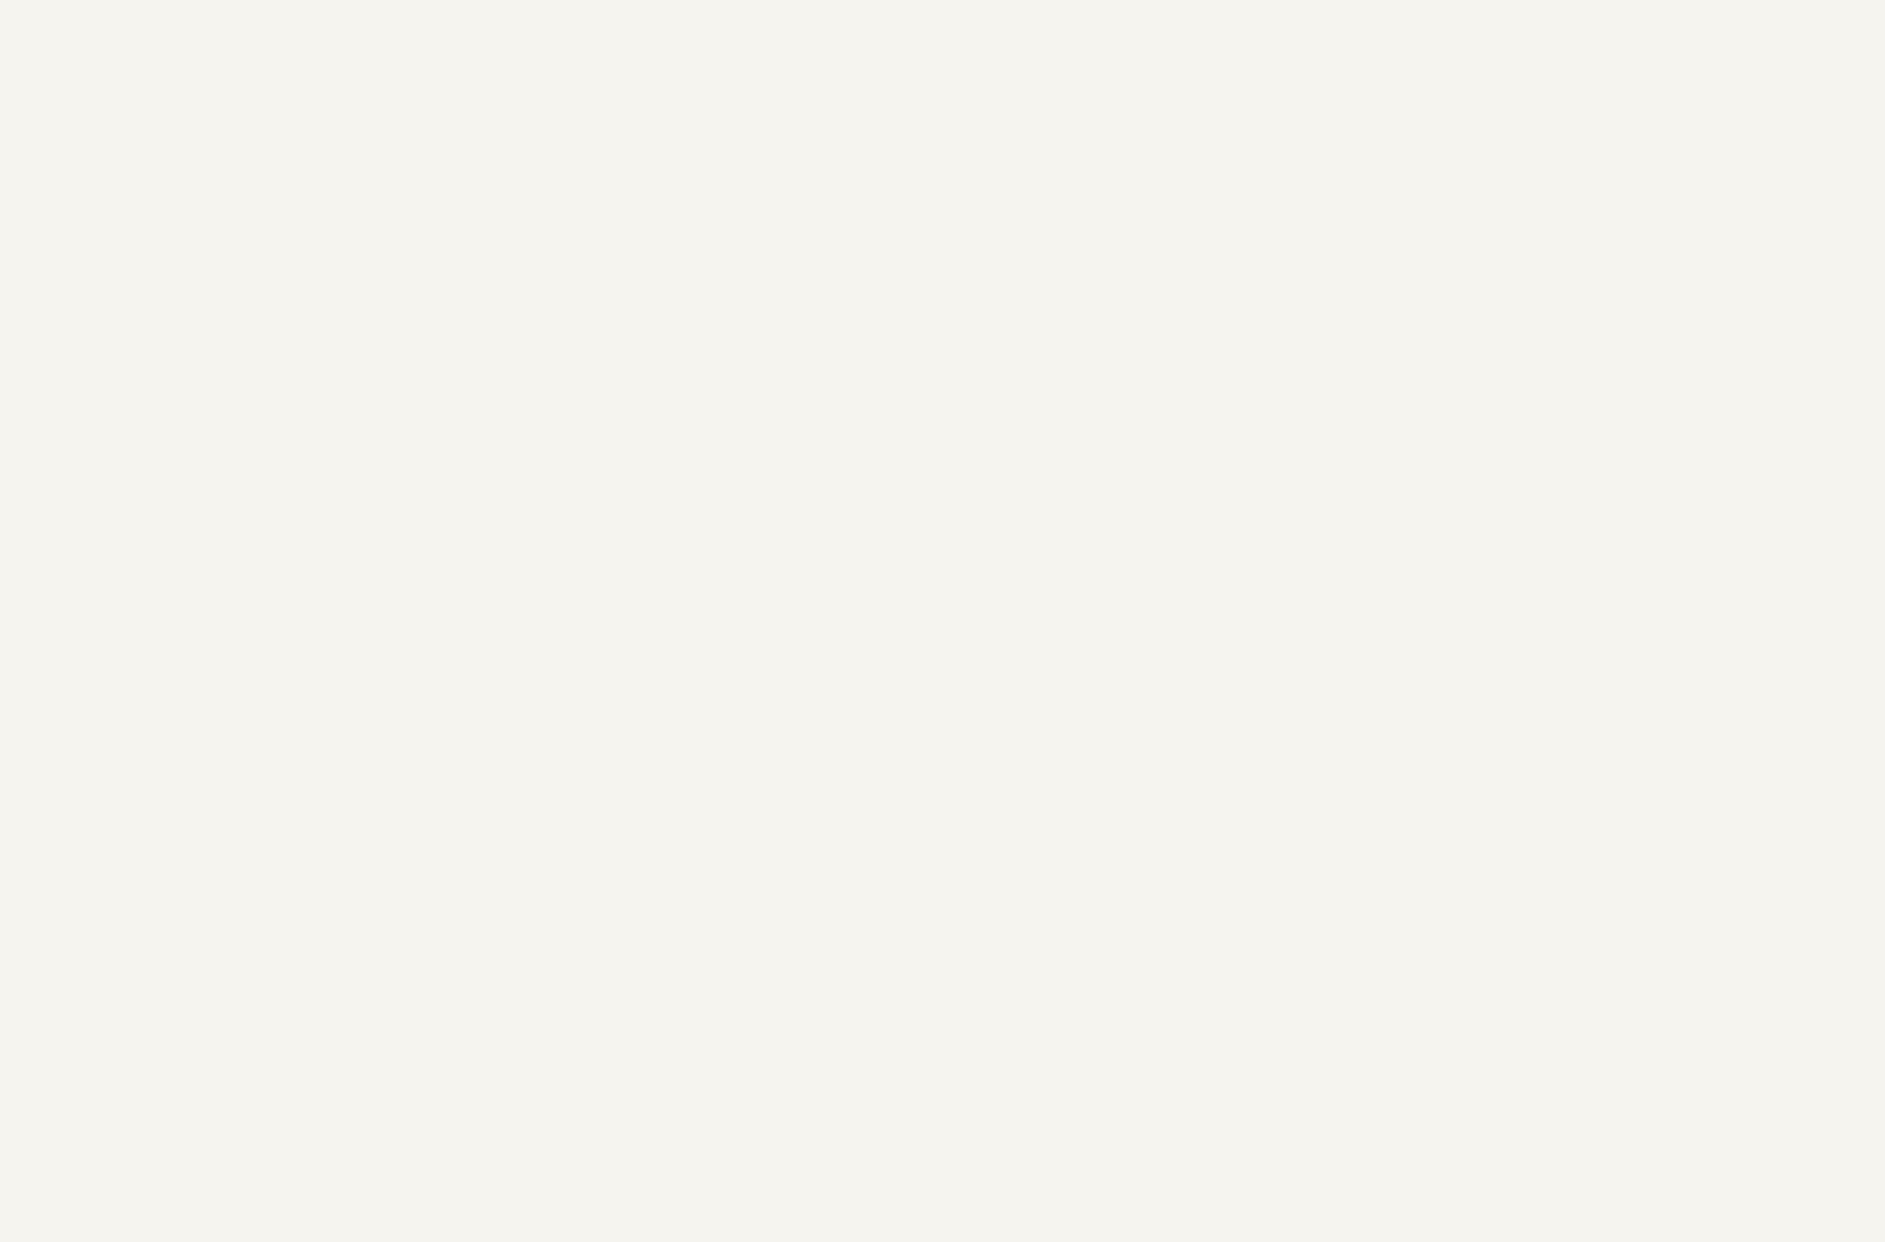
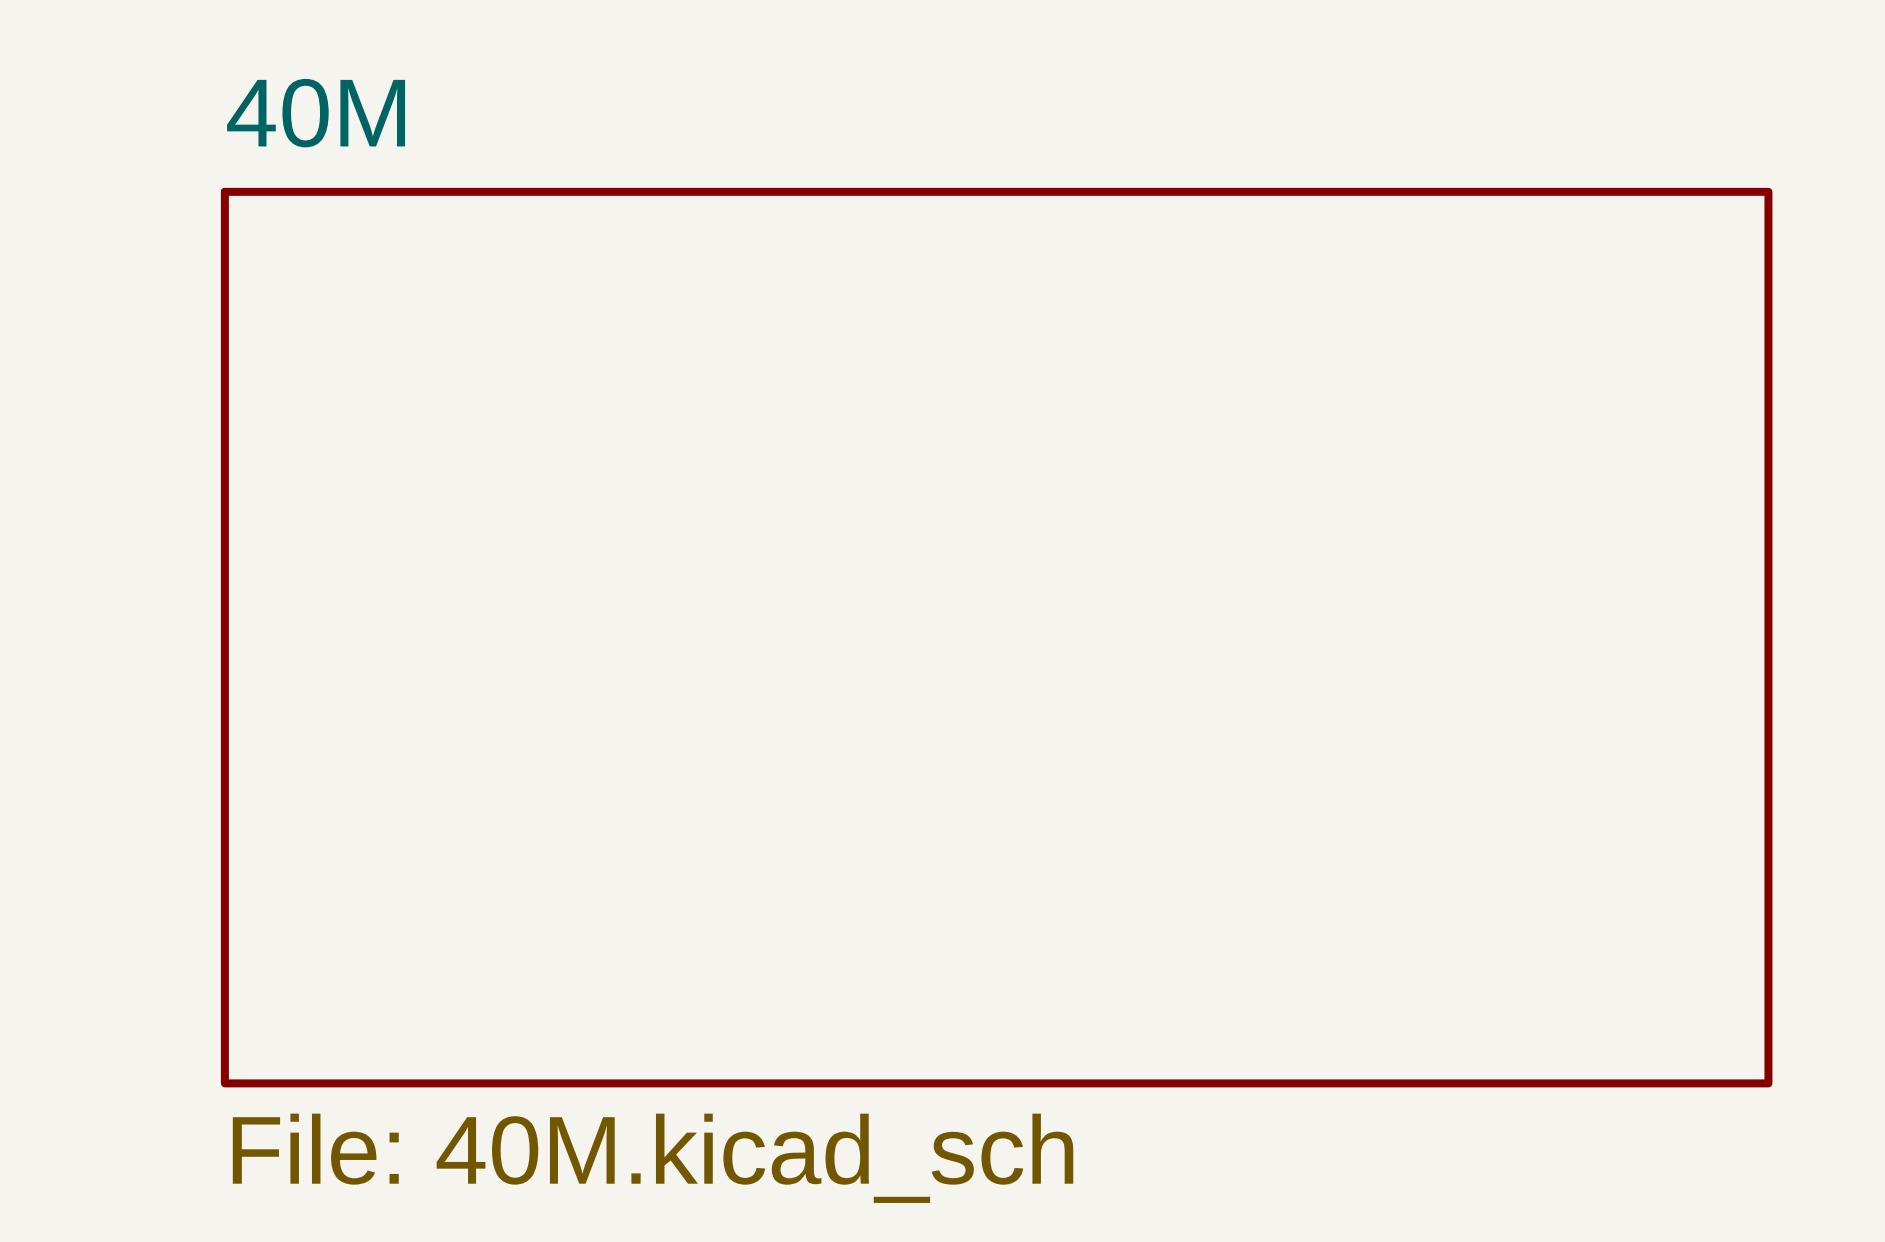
sheet 40M: none -> File: 40M.kicad_sch (996, 637)

